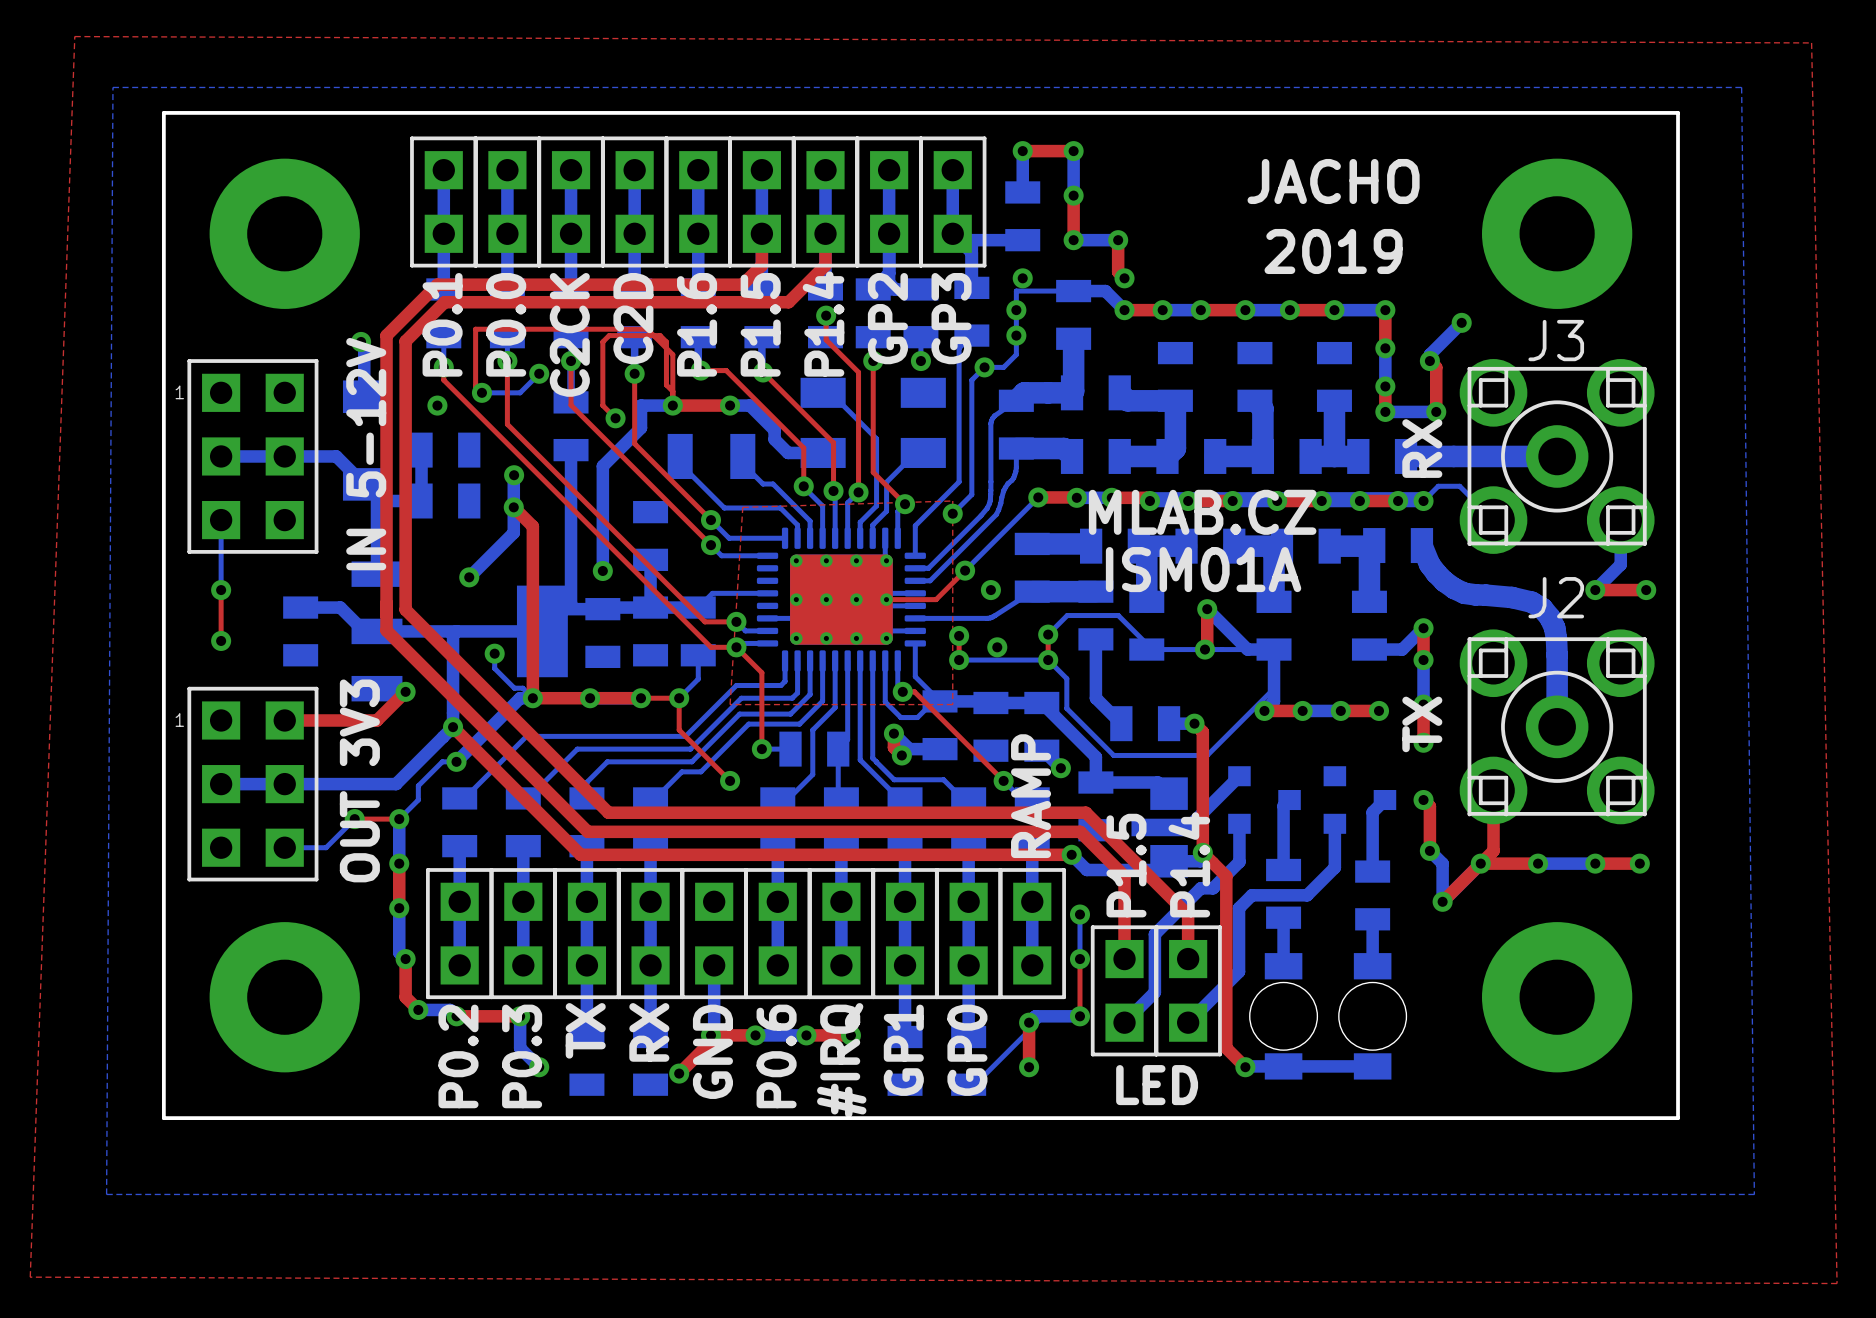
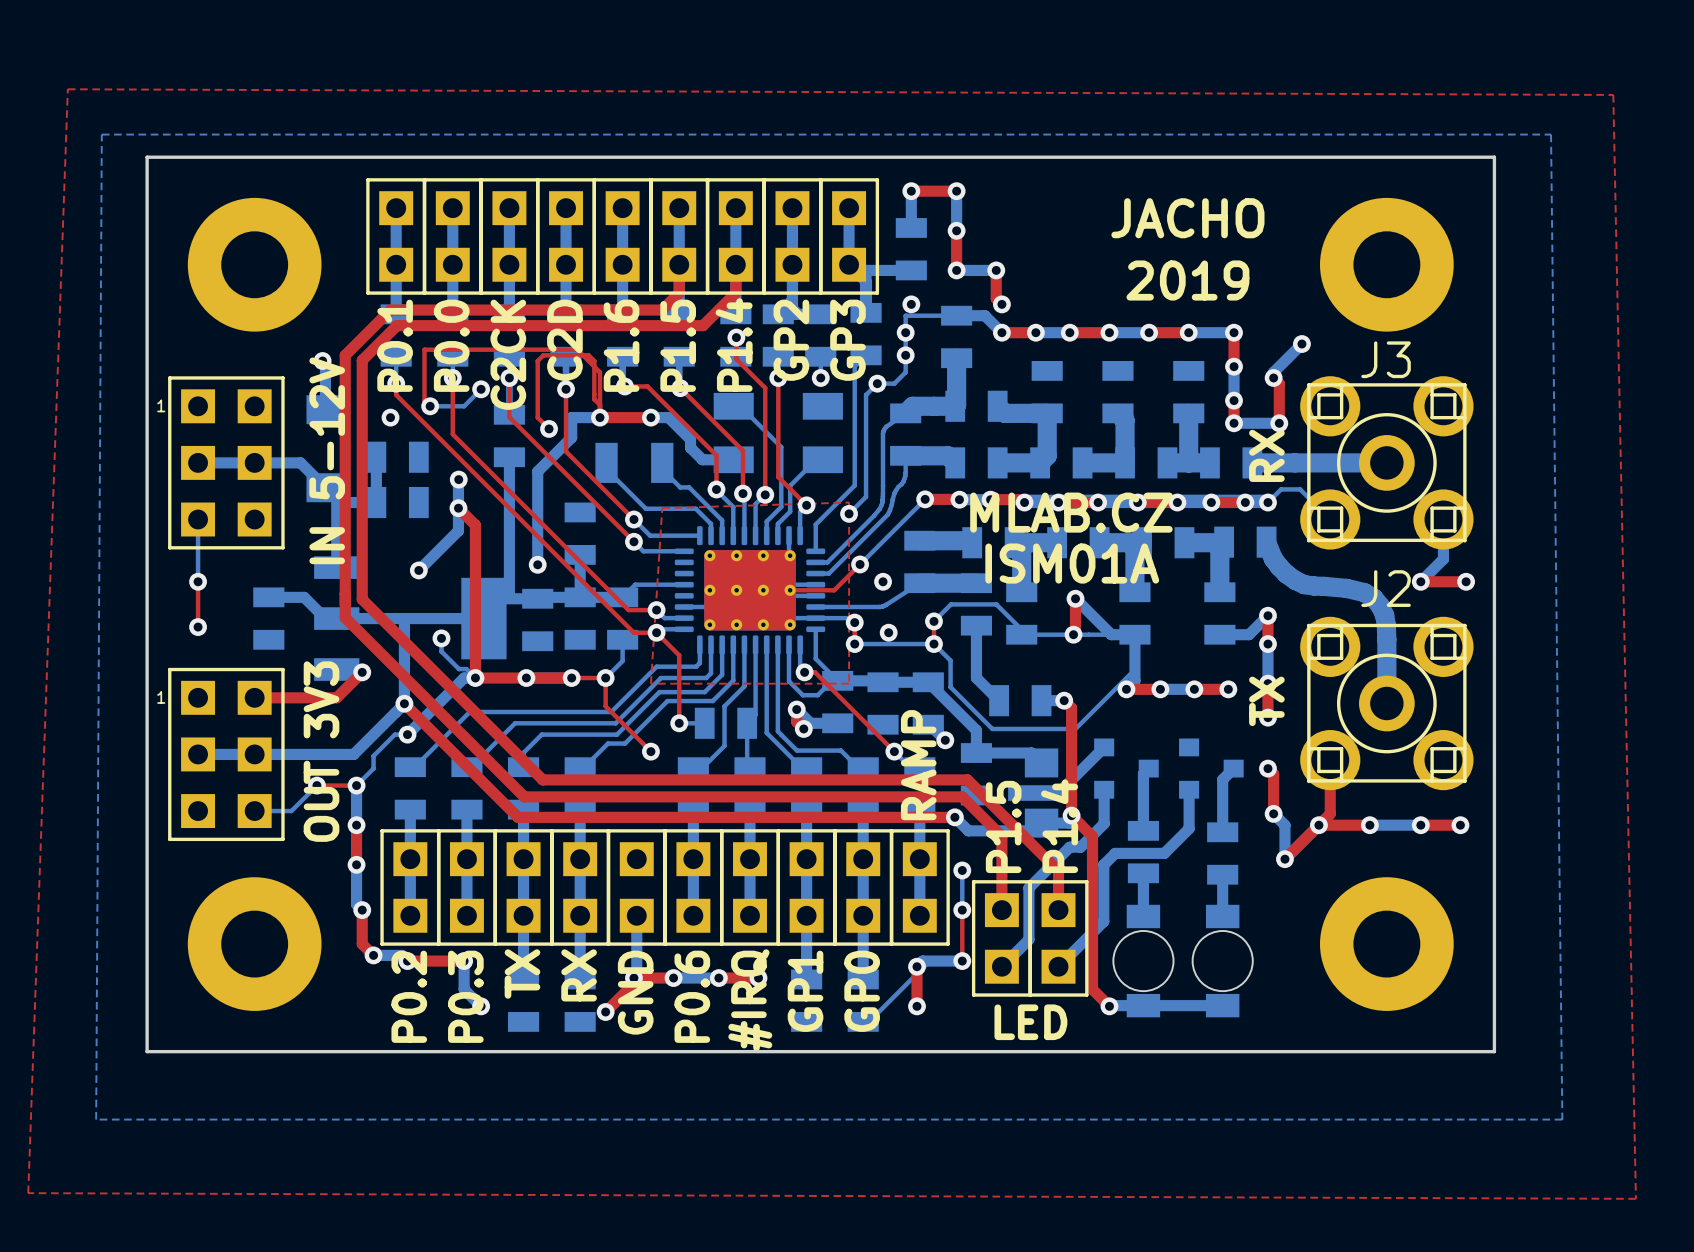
bottom track: none -> (815, 618) (850, 618) (854, 622)

